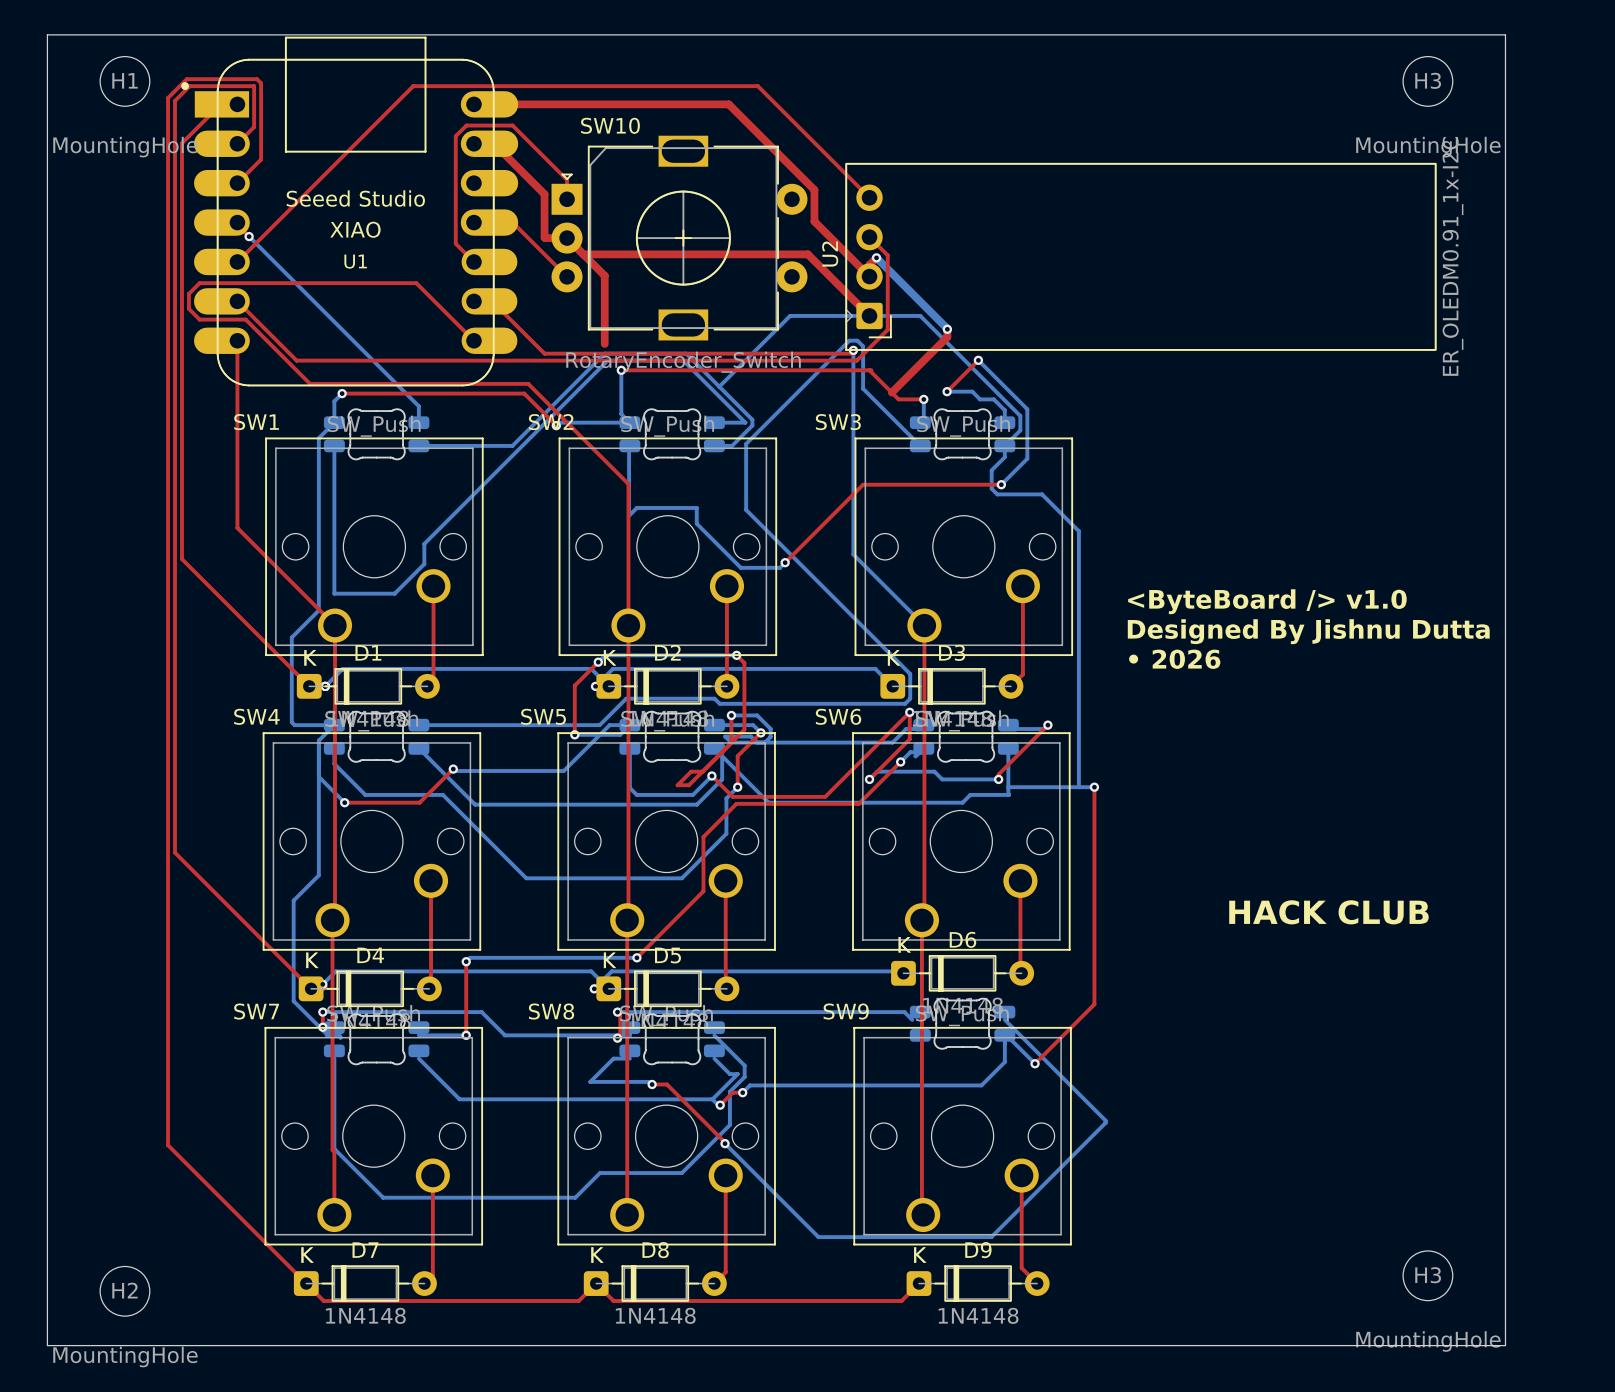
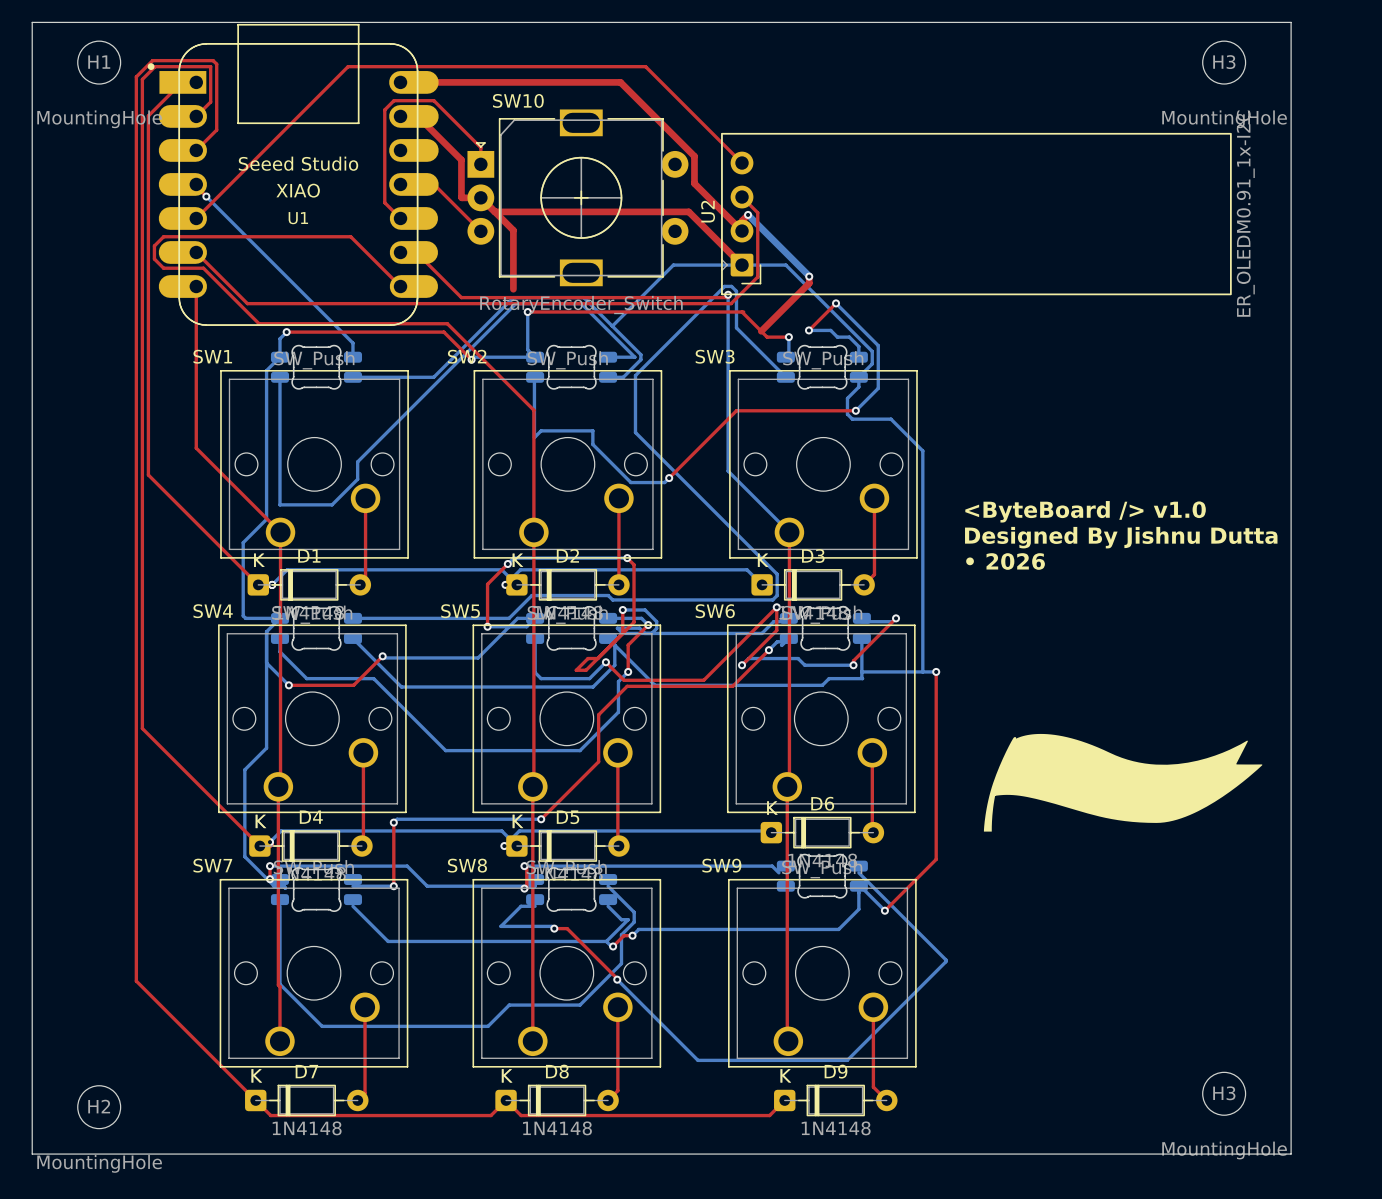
drawing: none -> [983, 733, 1263, 832]

